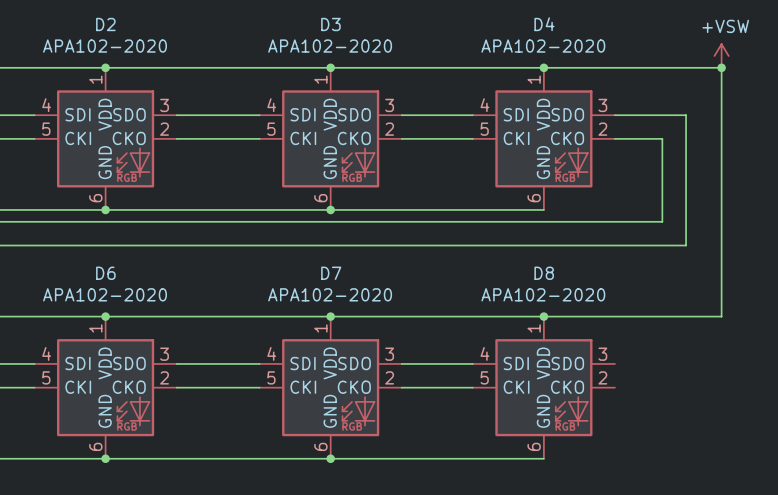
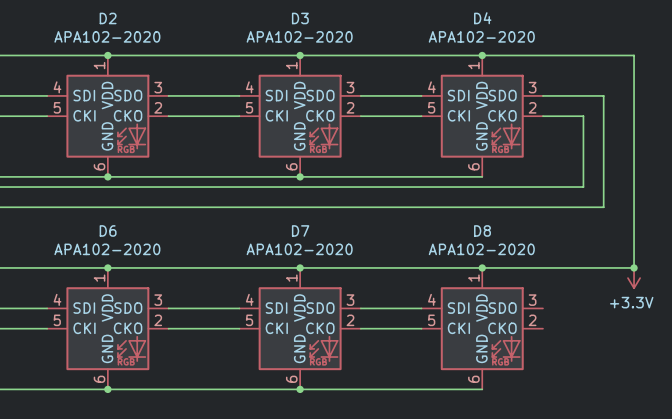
power symbol: +VSW (721, 55) -> none
junction: (721, 67) -> none
junction: none -> (634, 267)
power symbol: none -> +3.3V (634, 278)

